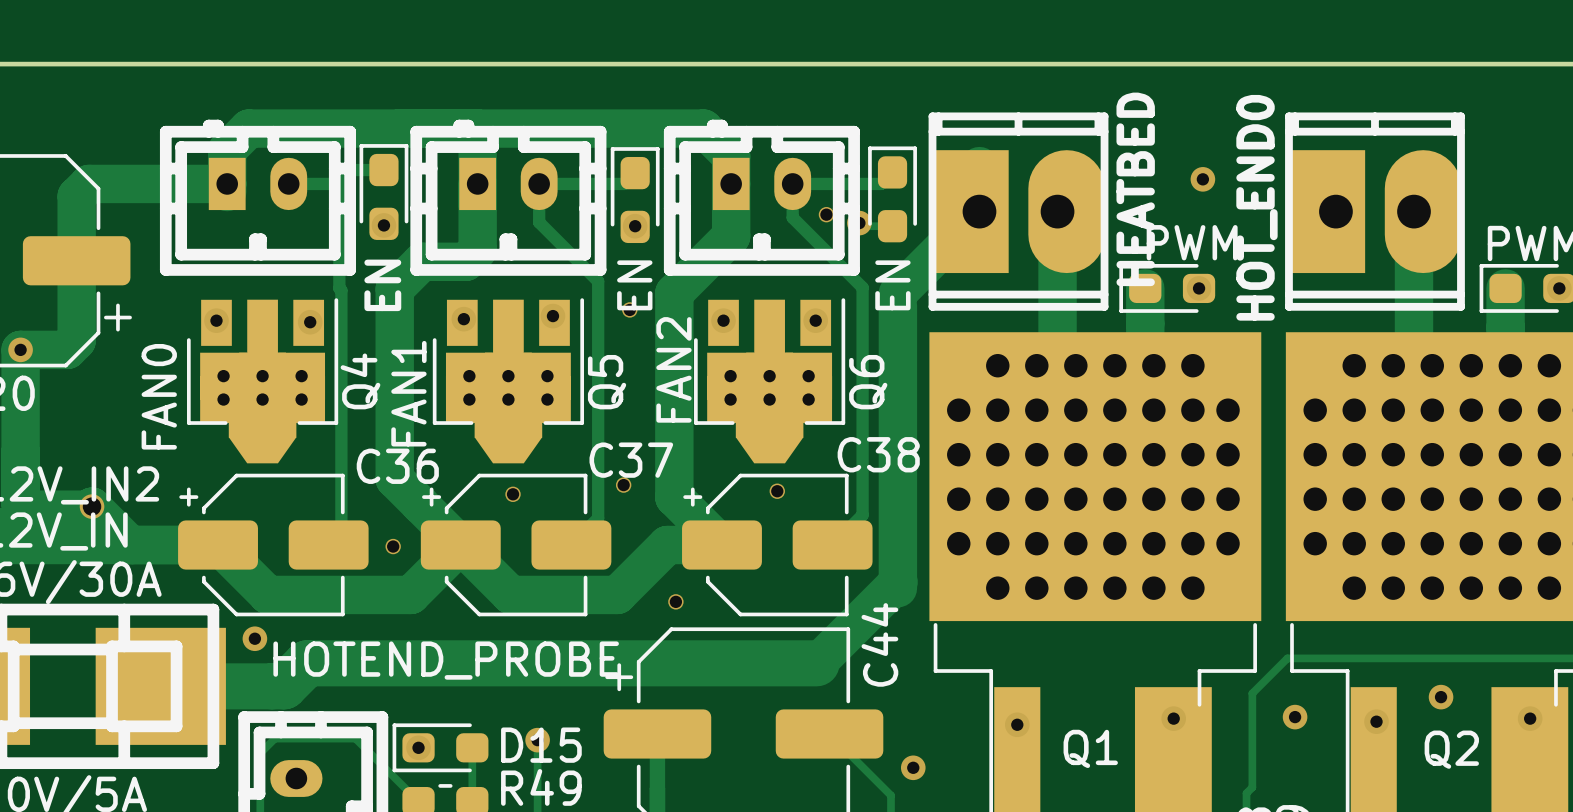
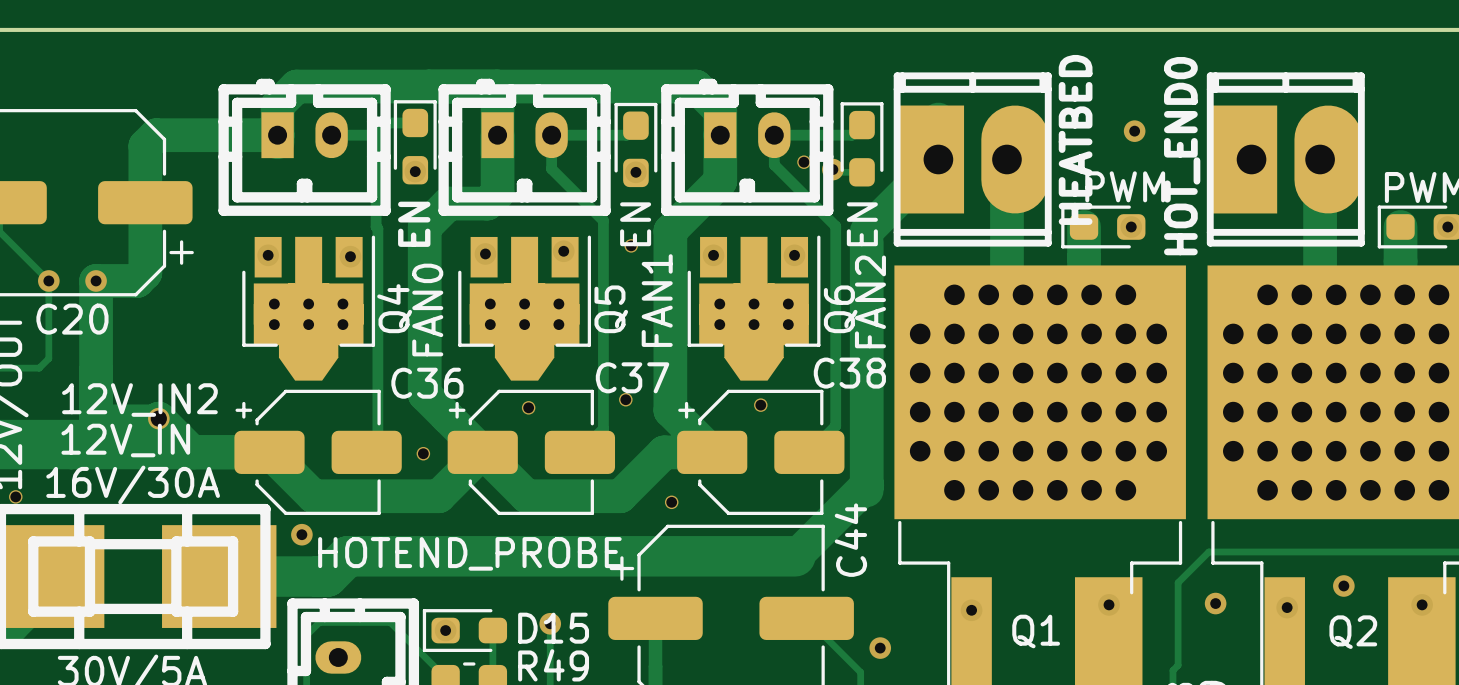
part value position: FAN2 (673, 369) -> FAN2 (870, 301)
part value position: FAN1 (408, 393) -> FAN1 (657, 300)
part value position: FAN0 (159, 396) -> FAN0 (427, 310)

